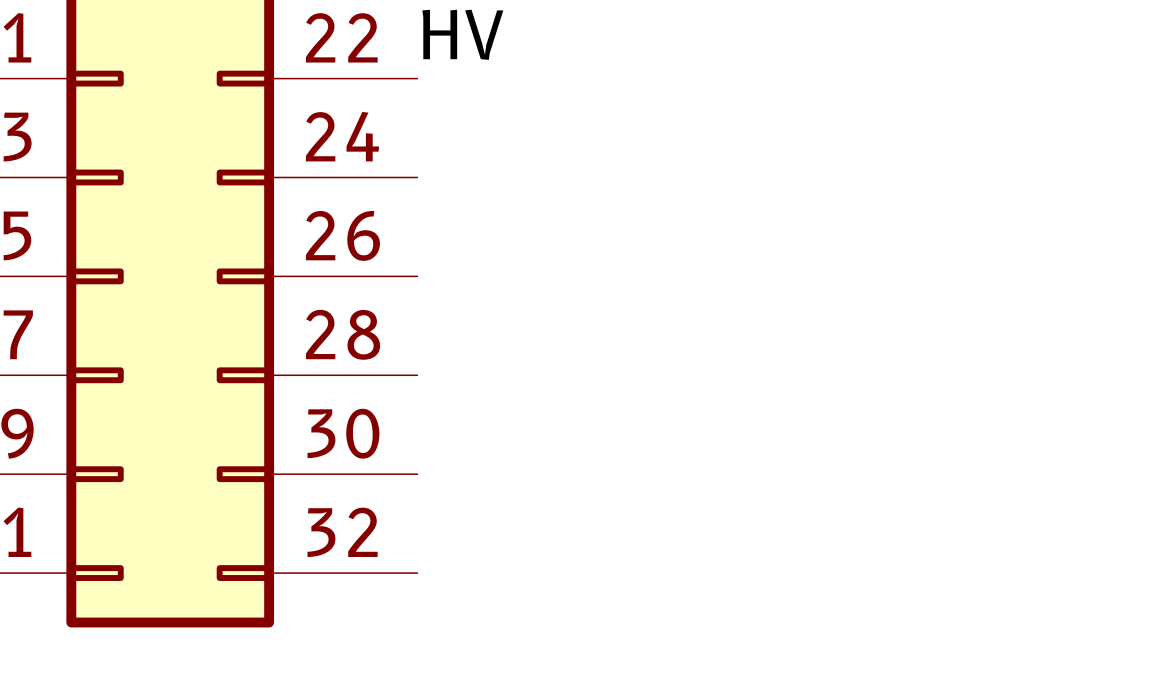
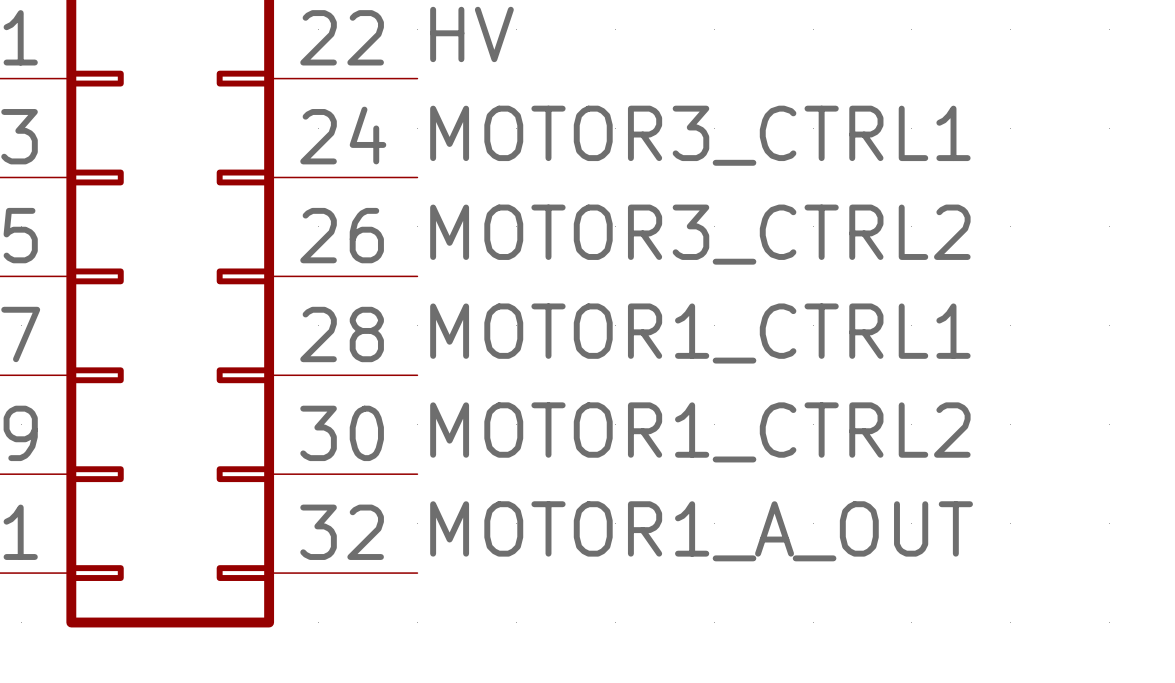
label: none -> MOTOR3_CTRL1 (700, 135)
label: none -> MOTOR3_CTRL2 (700, 234)
label: none -> MOTOR1_CTRL1 (700, 333)
label: none -> MOTOR1_CTRL2 (700, 432)
label: none -> MOTOR1_A_OUT (701, 531)

